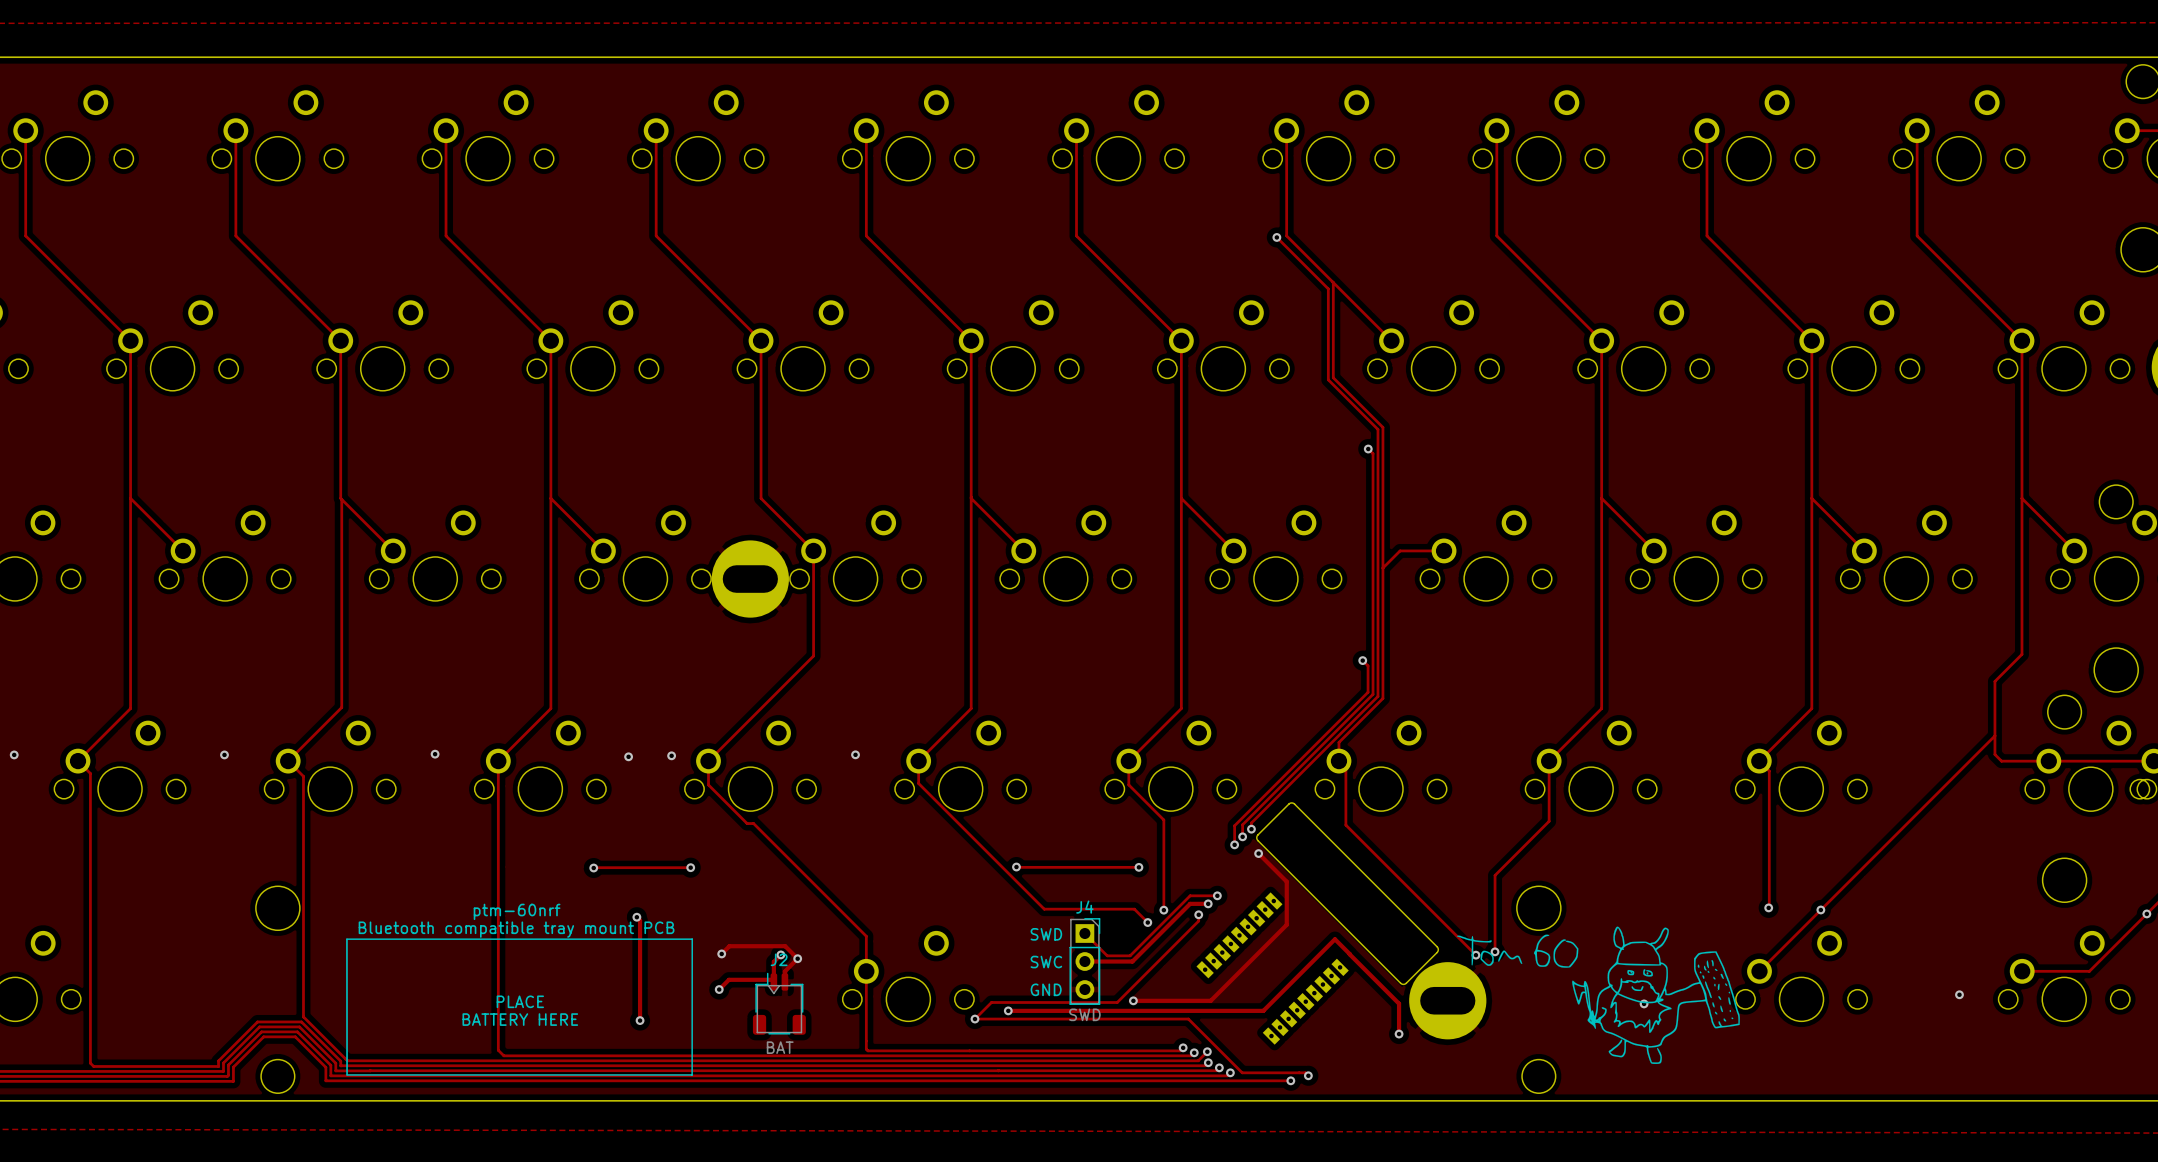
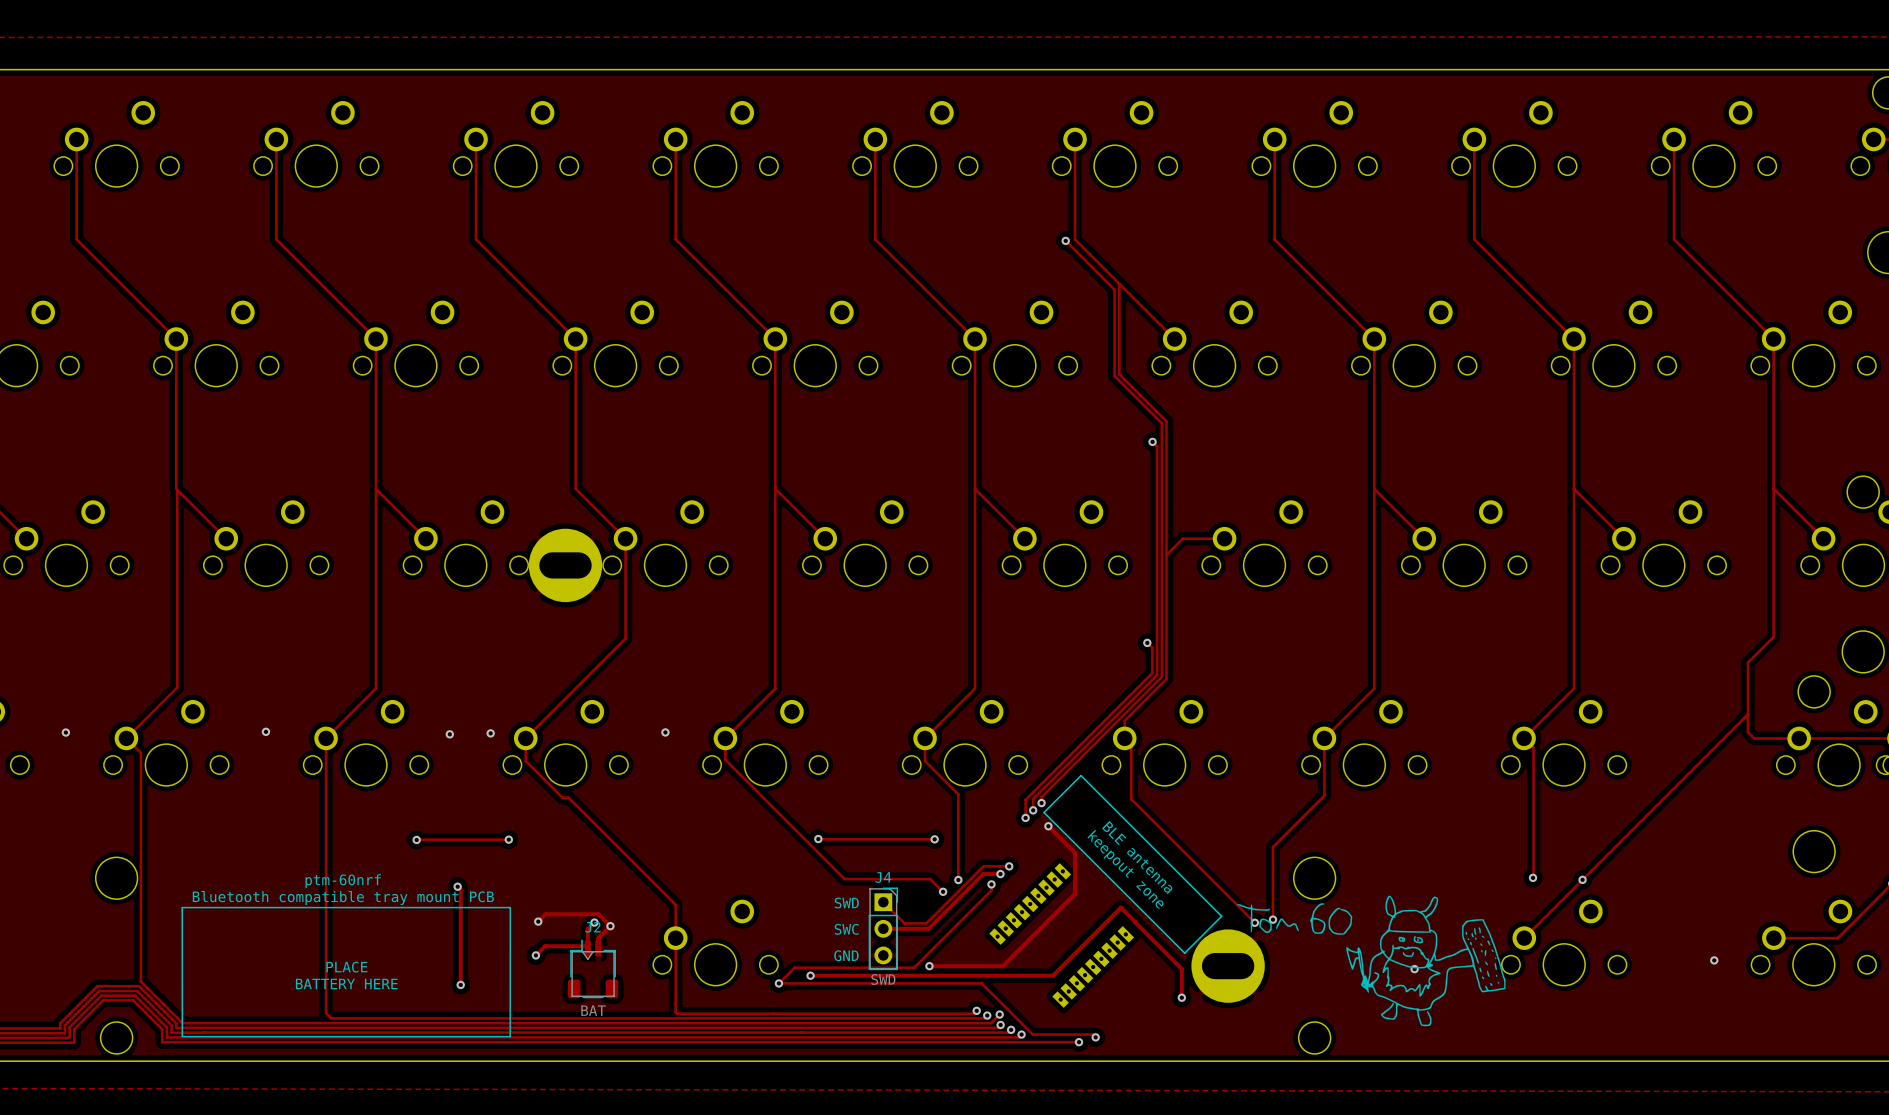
line: none -> (1081, 775) (1221, 916) (1184, 953) (1044, 812) (1081, 775)
board edge: (1288, 804) (1257, 834) (1257, 839) (1400, 983) (1405, 983) (1437, 952) (1437, 947) (1294, 804) (1288, 804) -> none
text: none -> BLE antenna (1137, 857)
text: none -> keepout zone (1125, 869)

